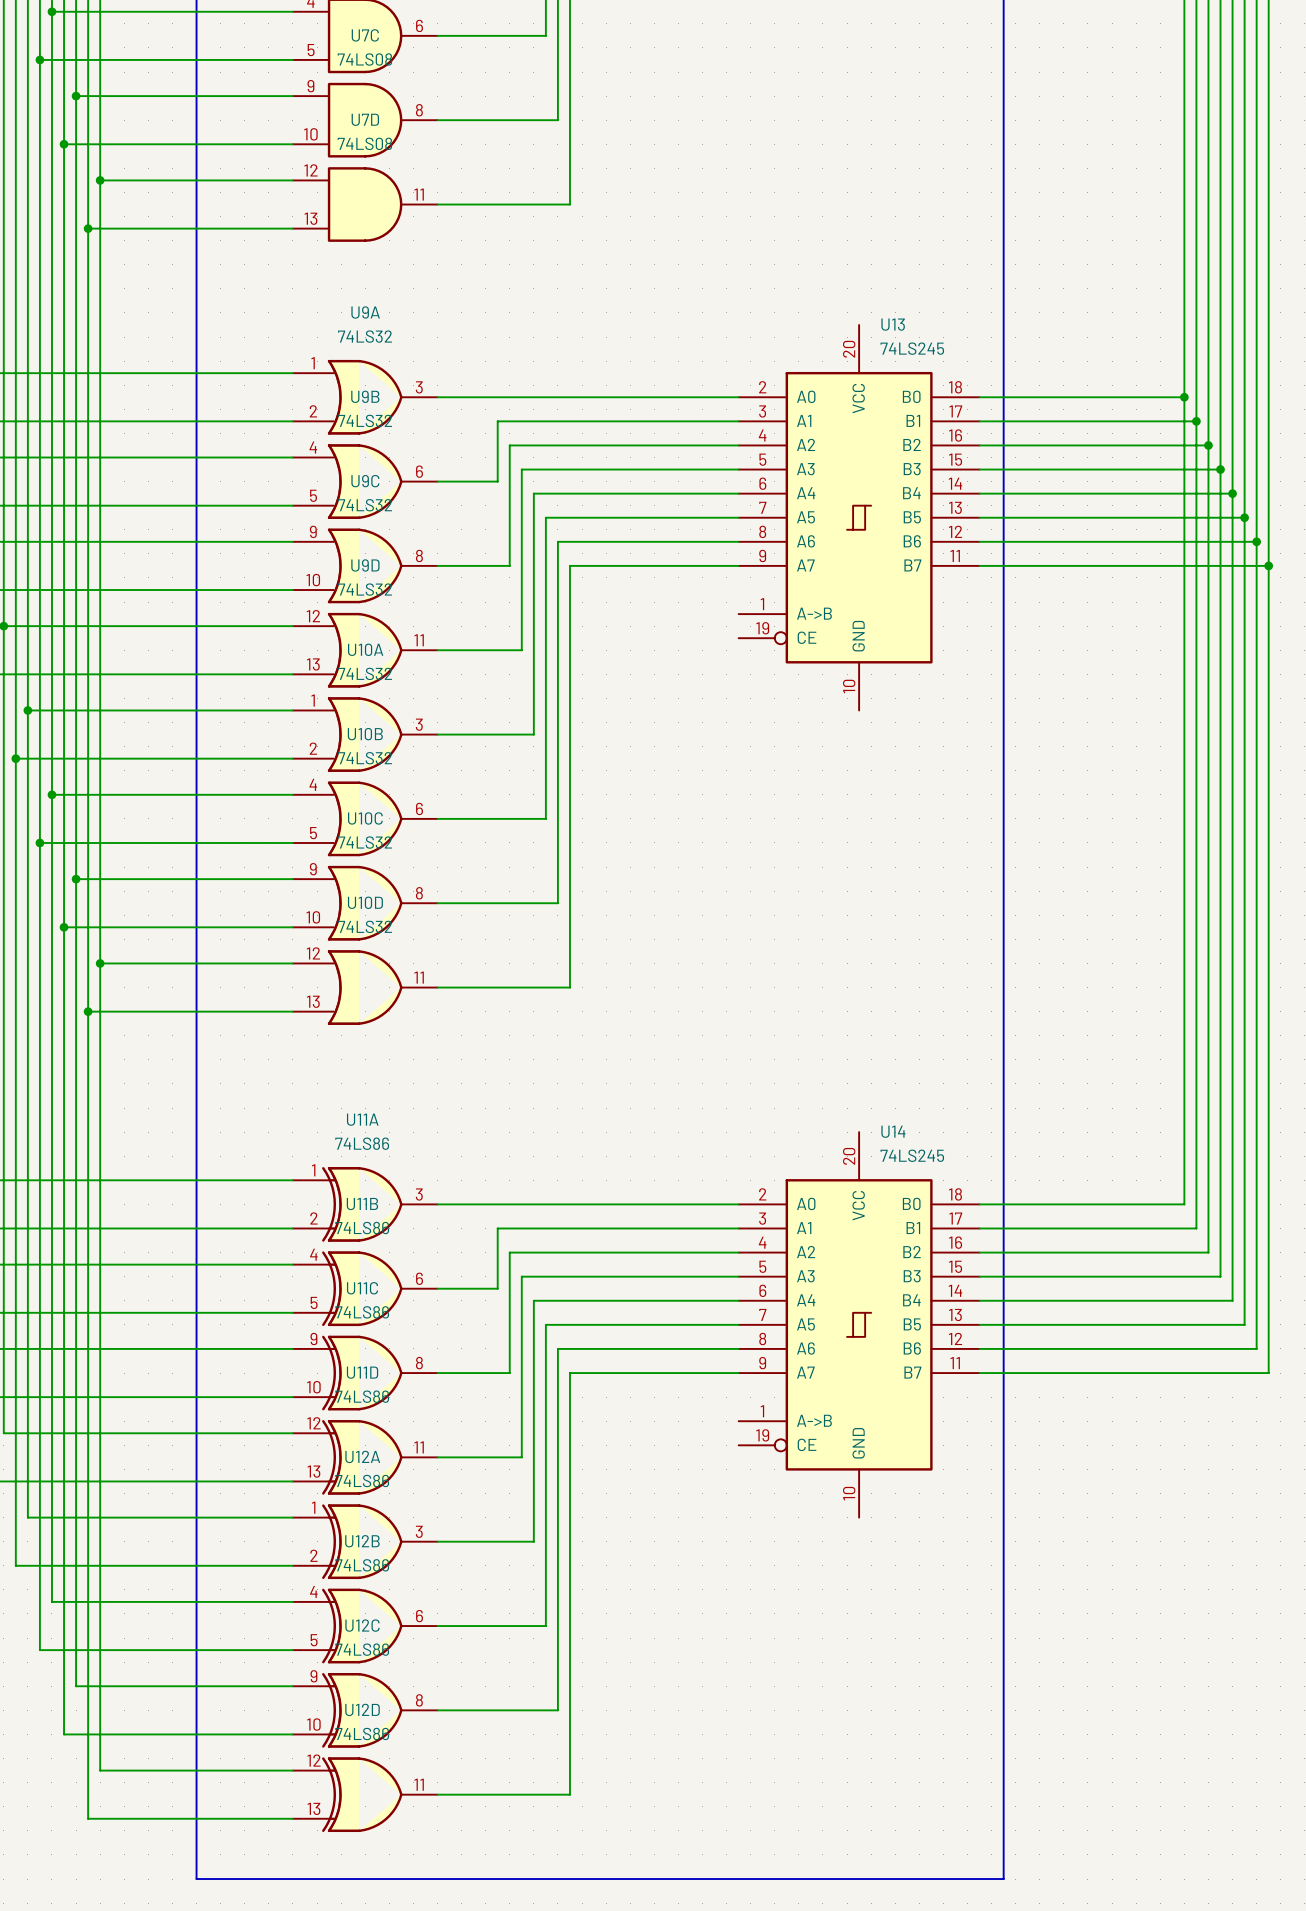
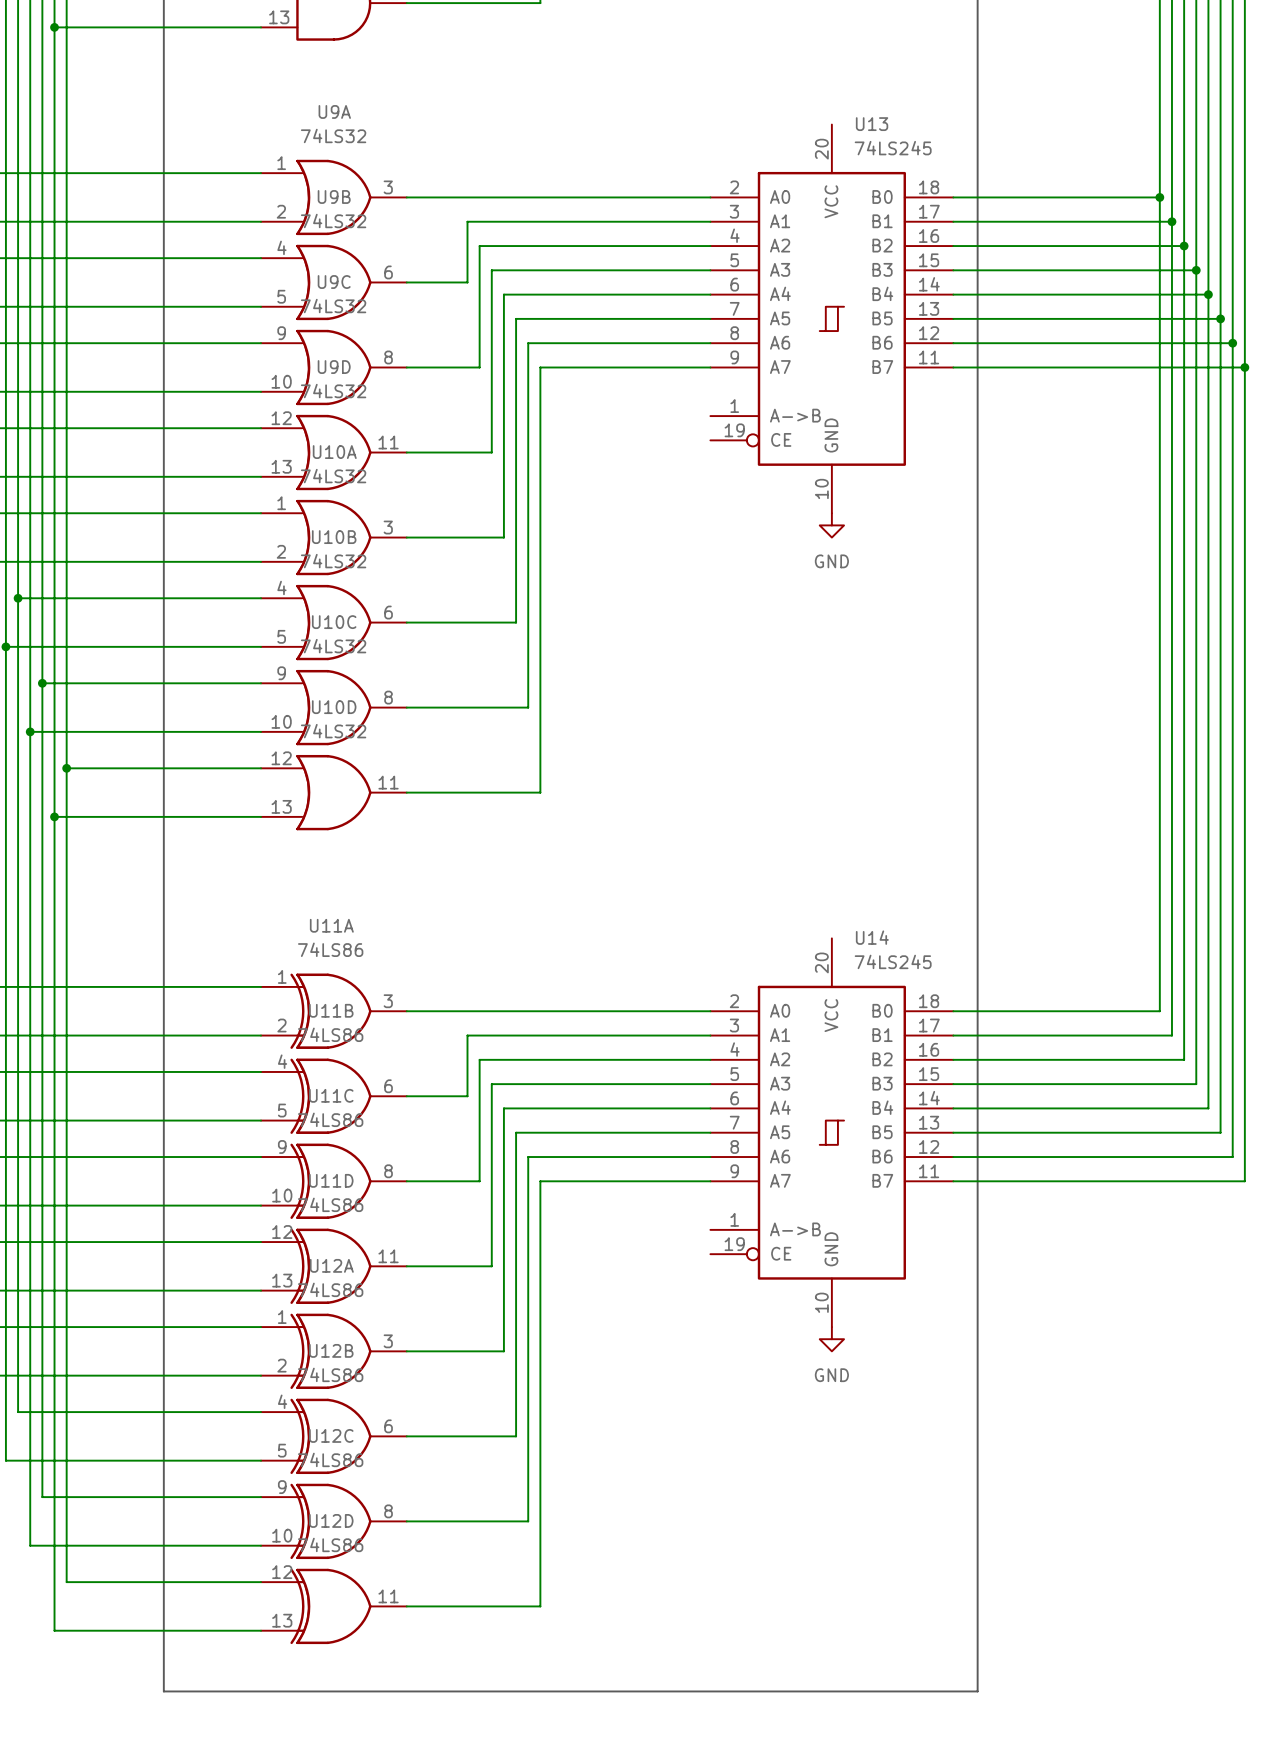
power symbol: none -> GND (831, 525)
power symbol: none -> GND (831, 1339)

